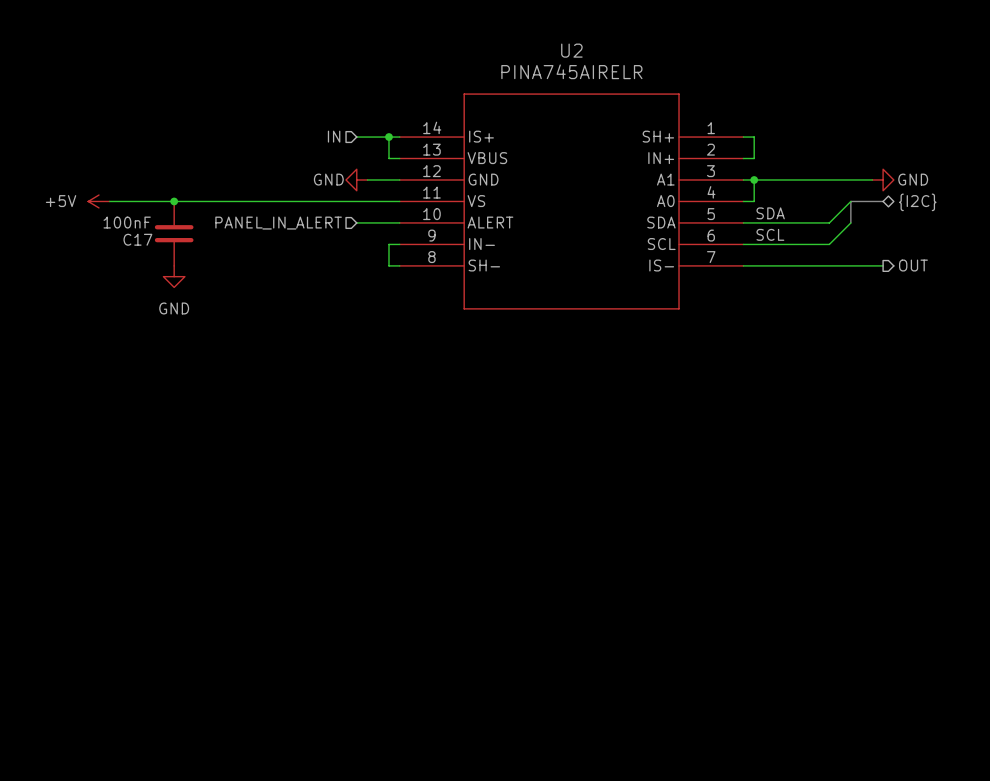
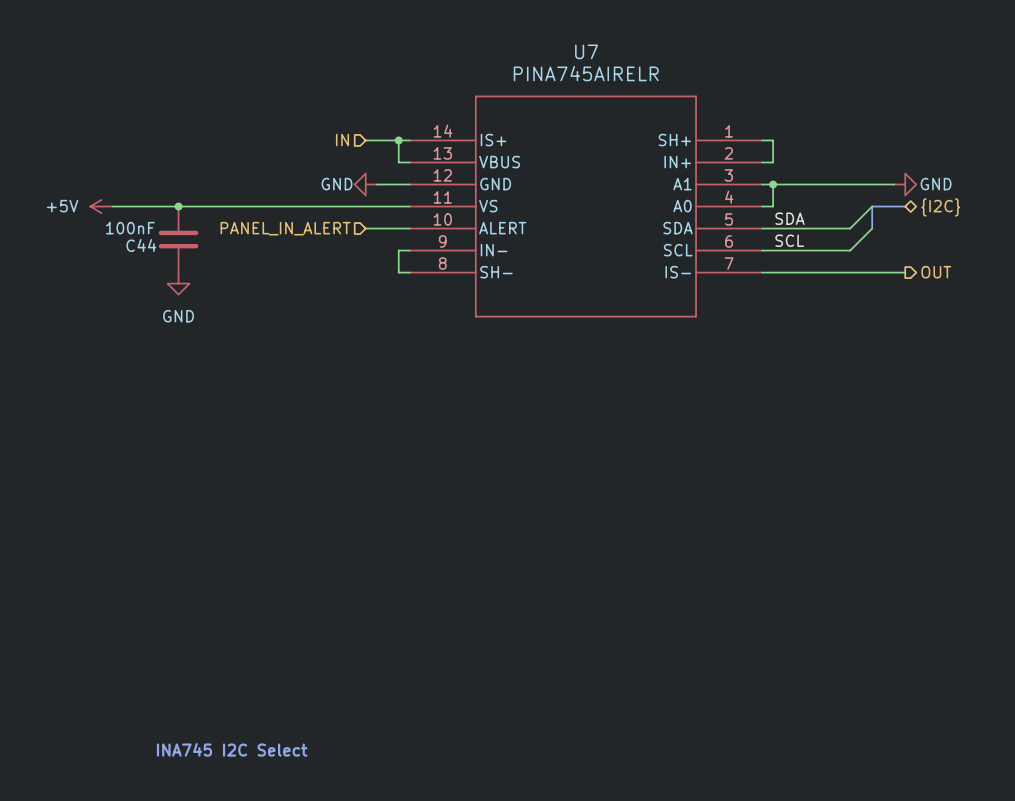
U2 name: U2 (571, 50) -> U7 (586, 51)
C17 name: C17 (137, 239) -> C44 (141, 245)
text: none -> INA745 I2C Select (232, 749)

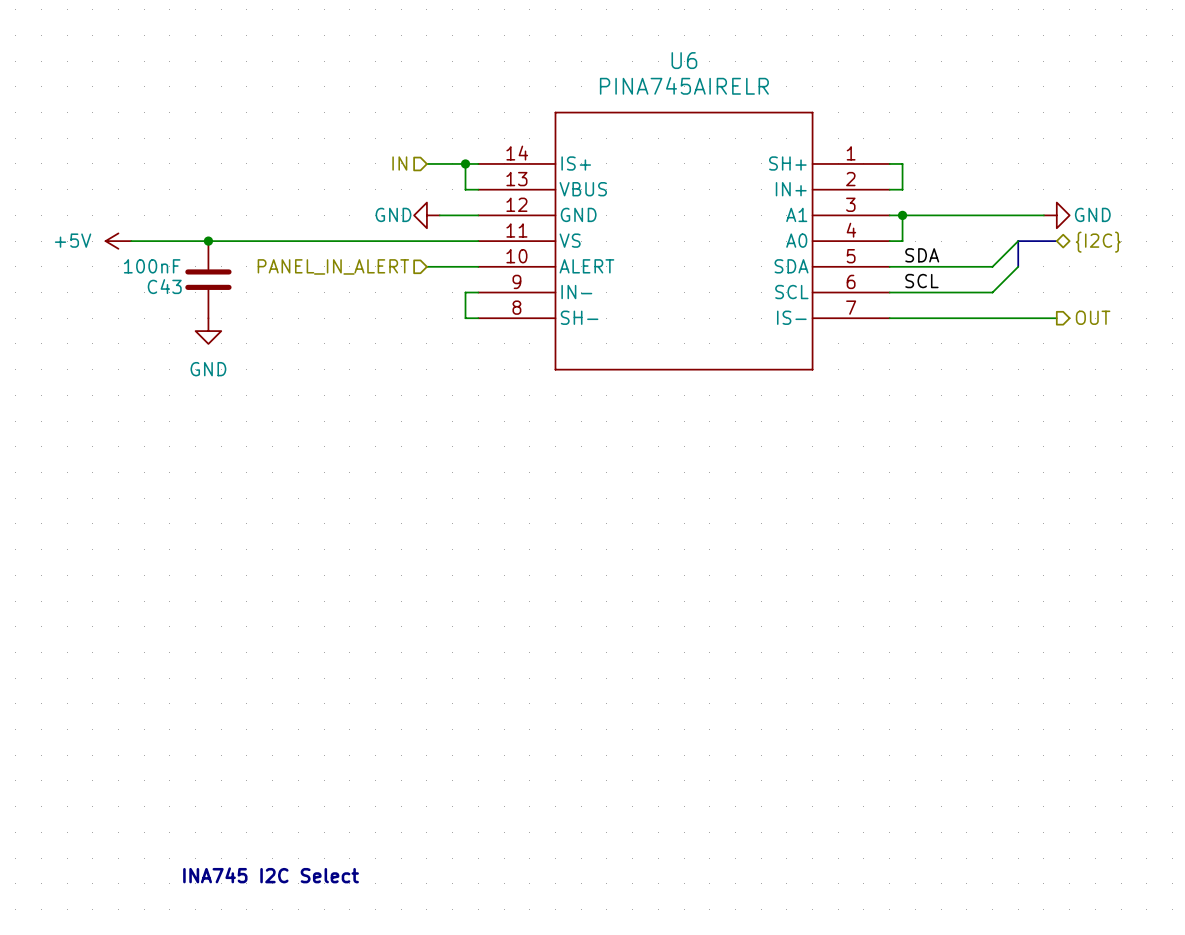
U7 name: U7 (586, 51) -> U6 (684, 60)
C44 name: C44 (141, 245) -> C43 (164, 286)

